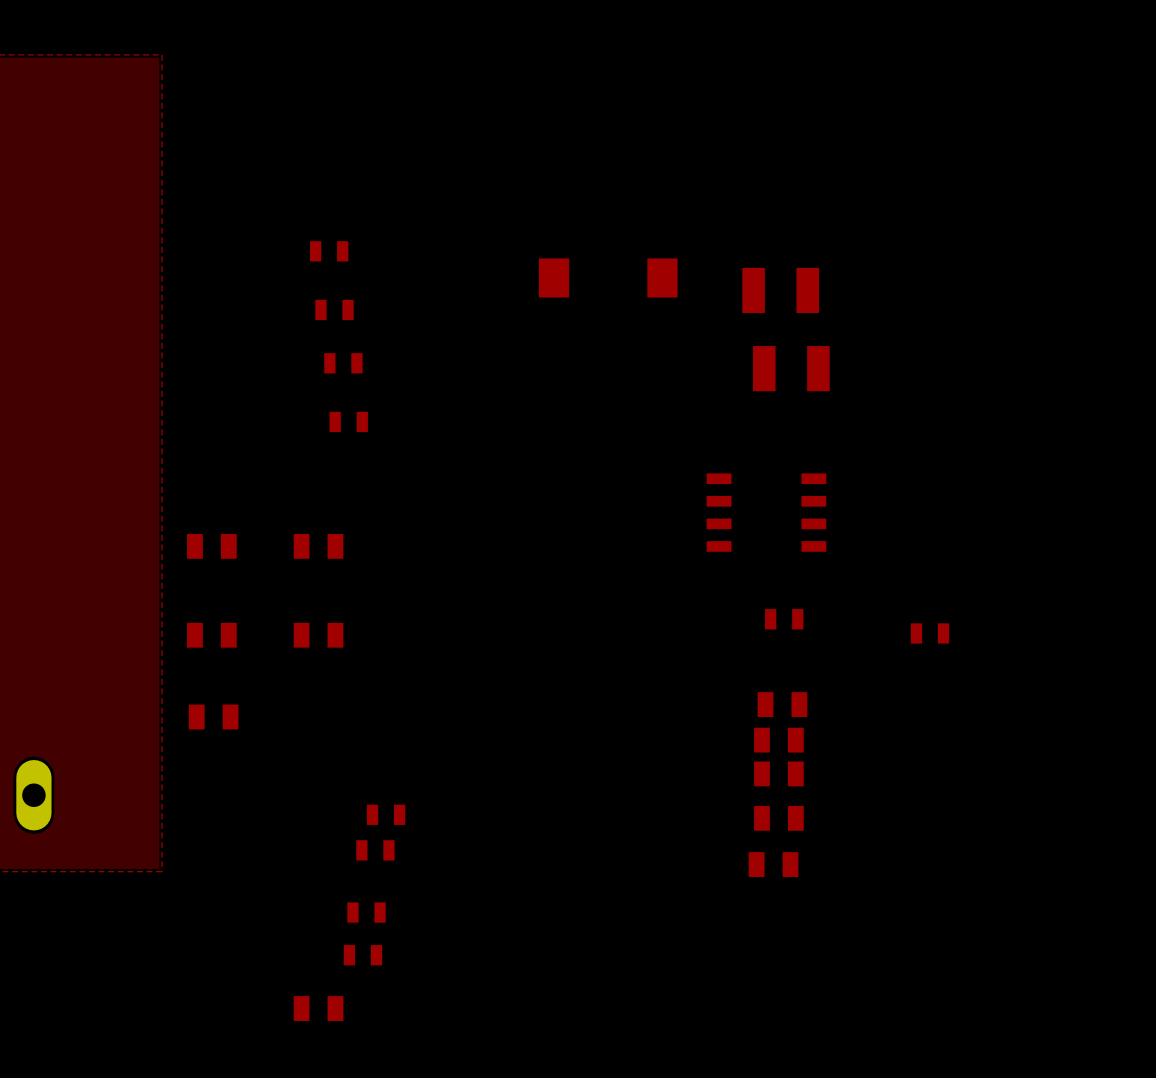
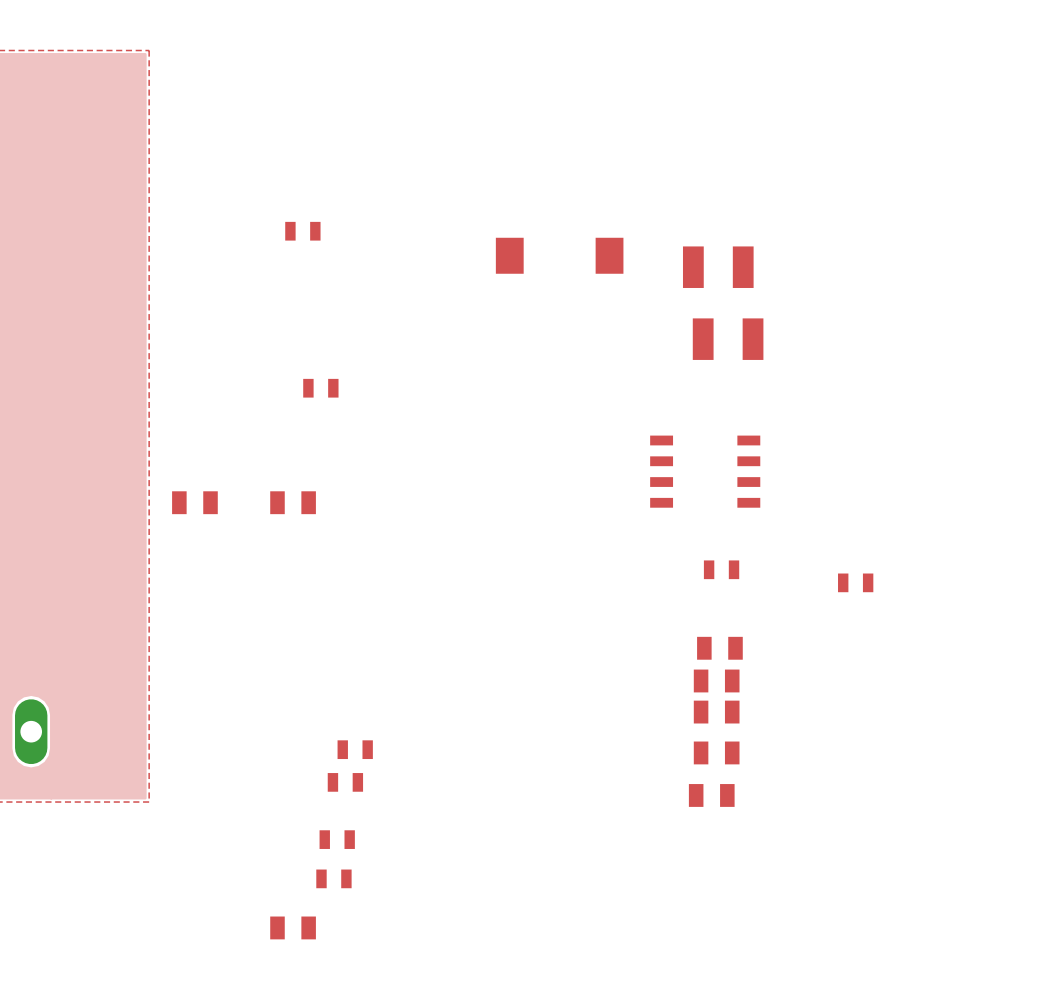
part: (334, 309) -> none
part: (343, 363) -> none
part: (211, 635) -> none
part: (318, 635) -> none
part: (213, 717) -> none

